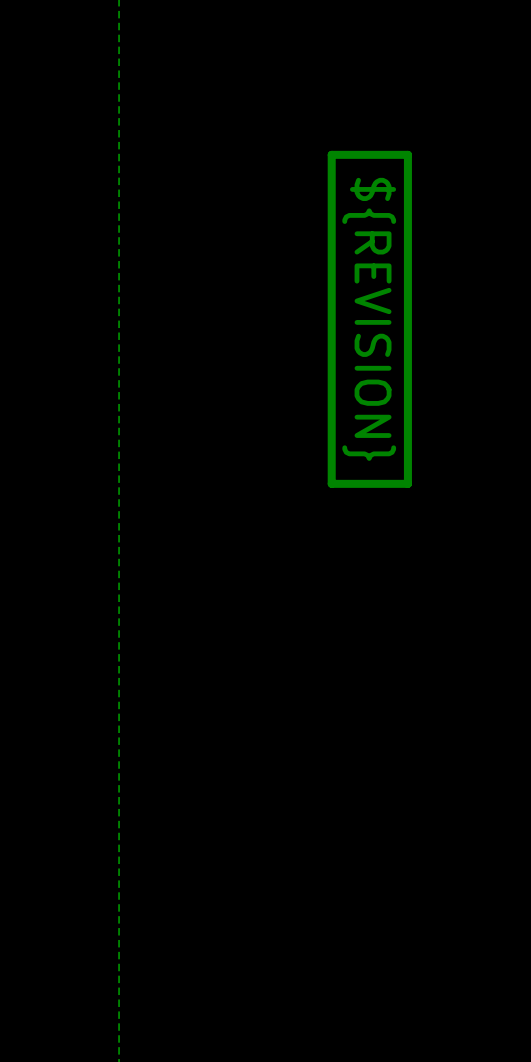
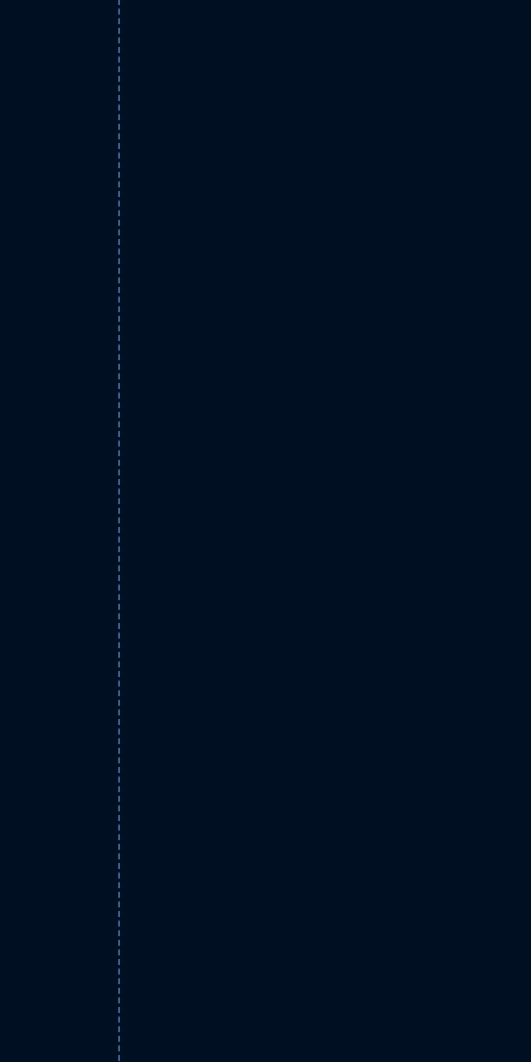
track: (407, 154) (407, 483) (331, 483) (331, 154) (407, 154) -> none
text: ${REVISION} (369, 319) -> none

